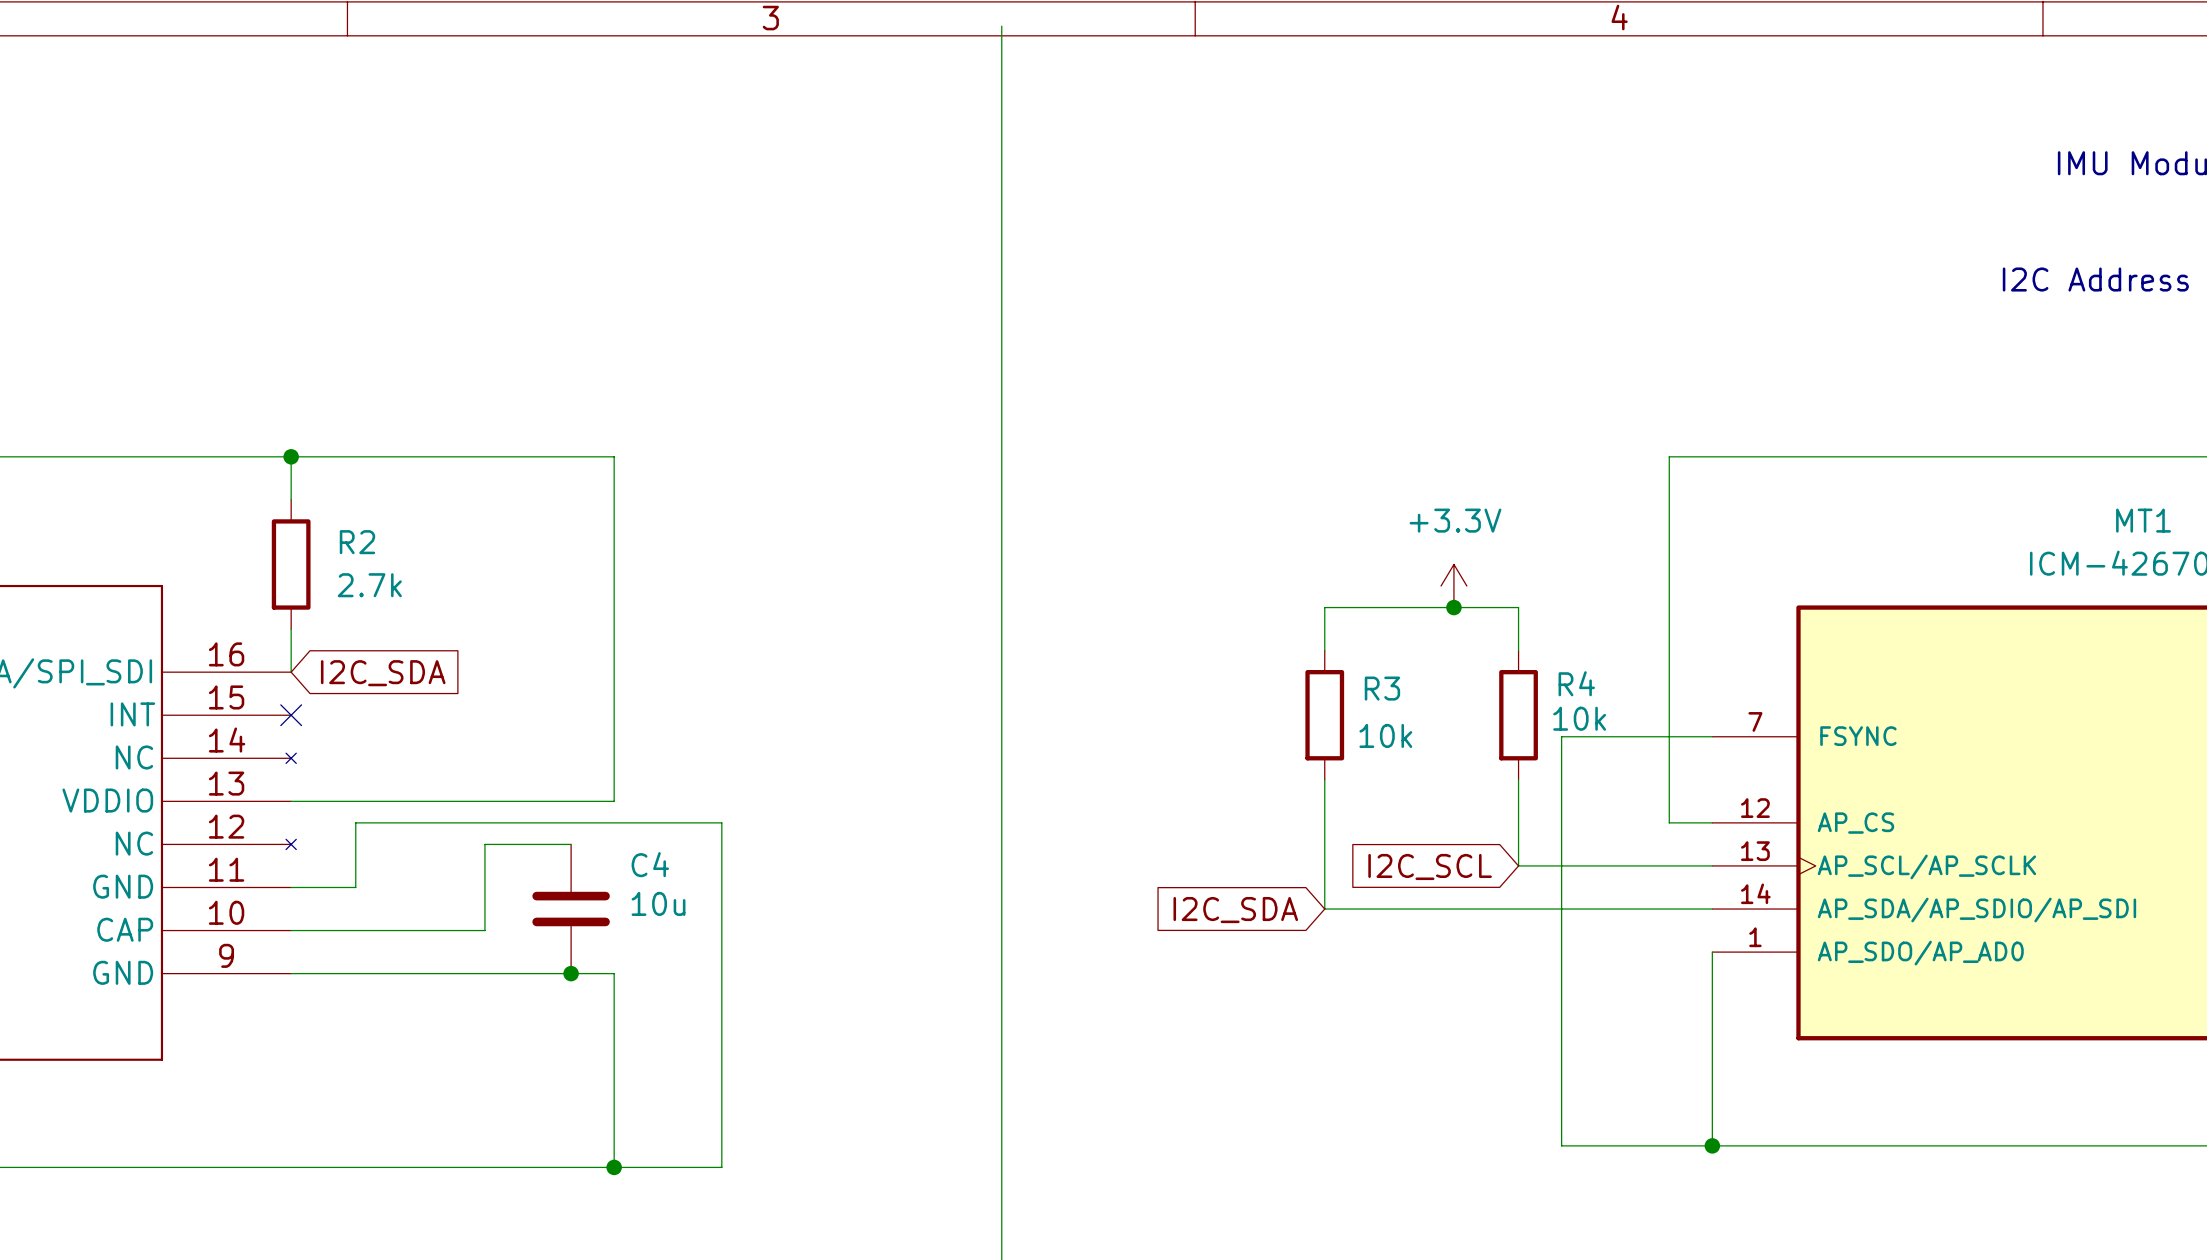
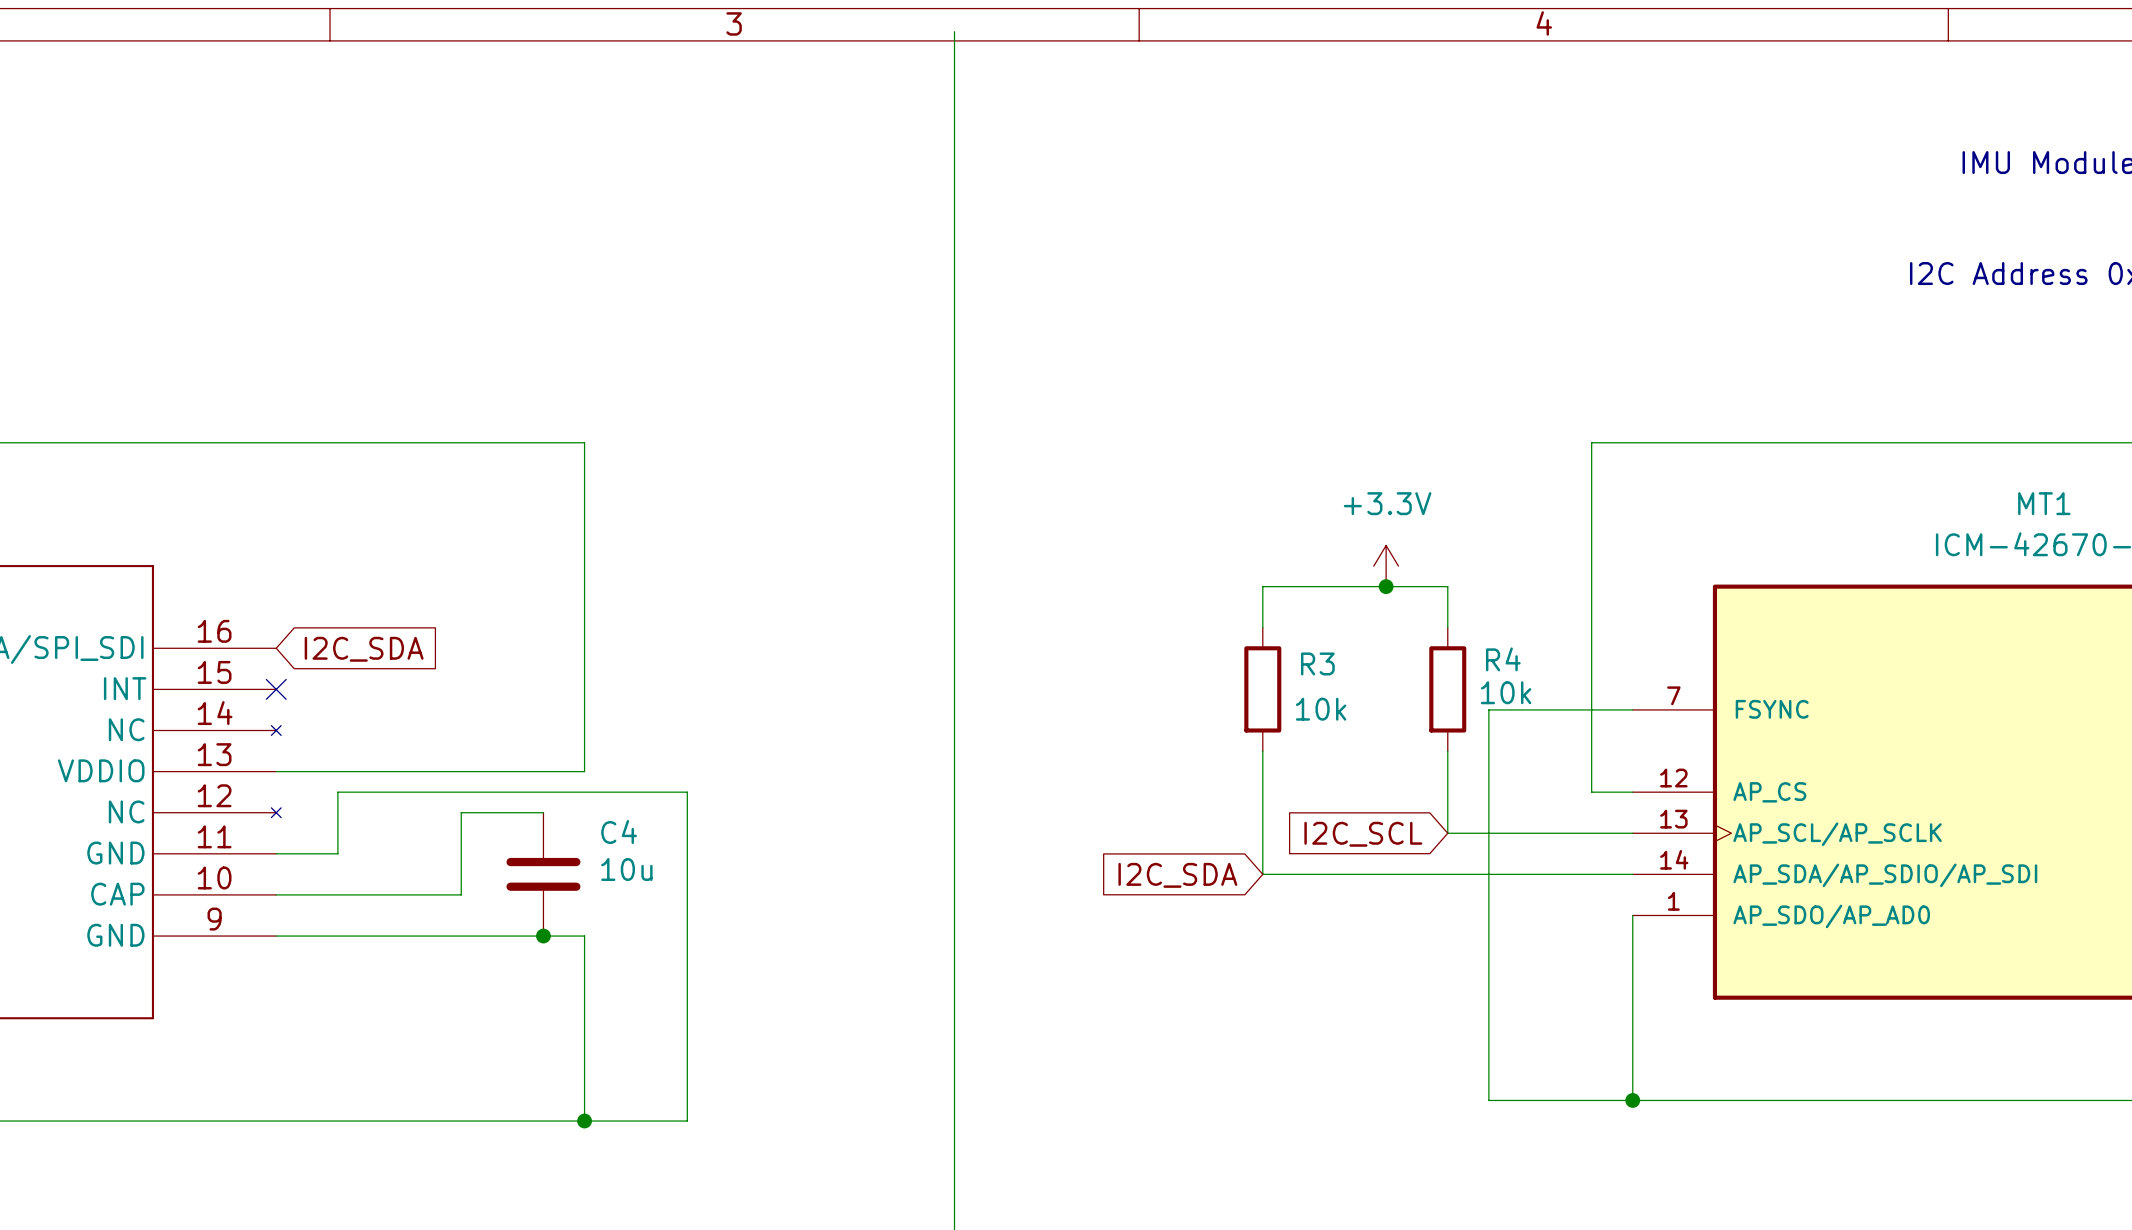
wire: (291, 456) (291, 499) -> none
junction: (291, 456) -> none
R2: 2.7k (291, 564) -> none
wire: (291, 629) (291, 672) -> none

